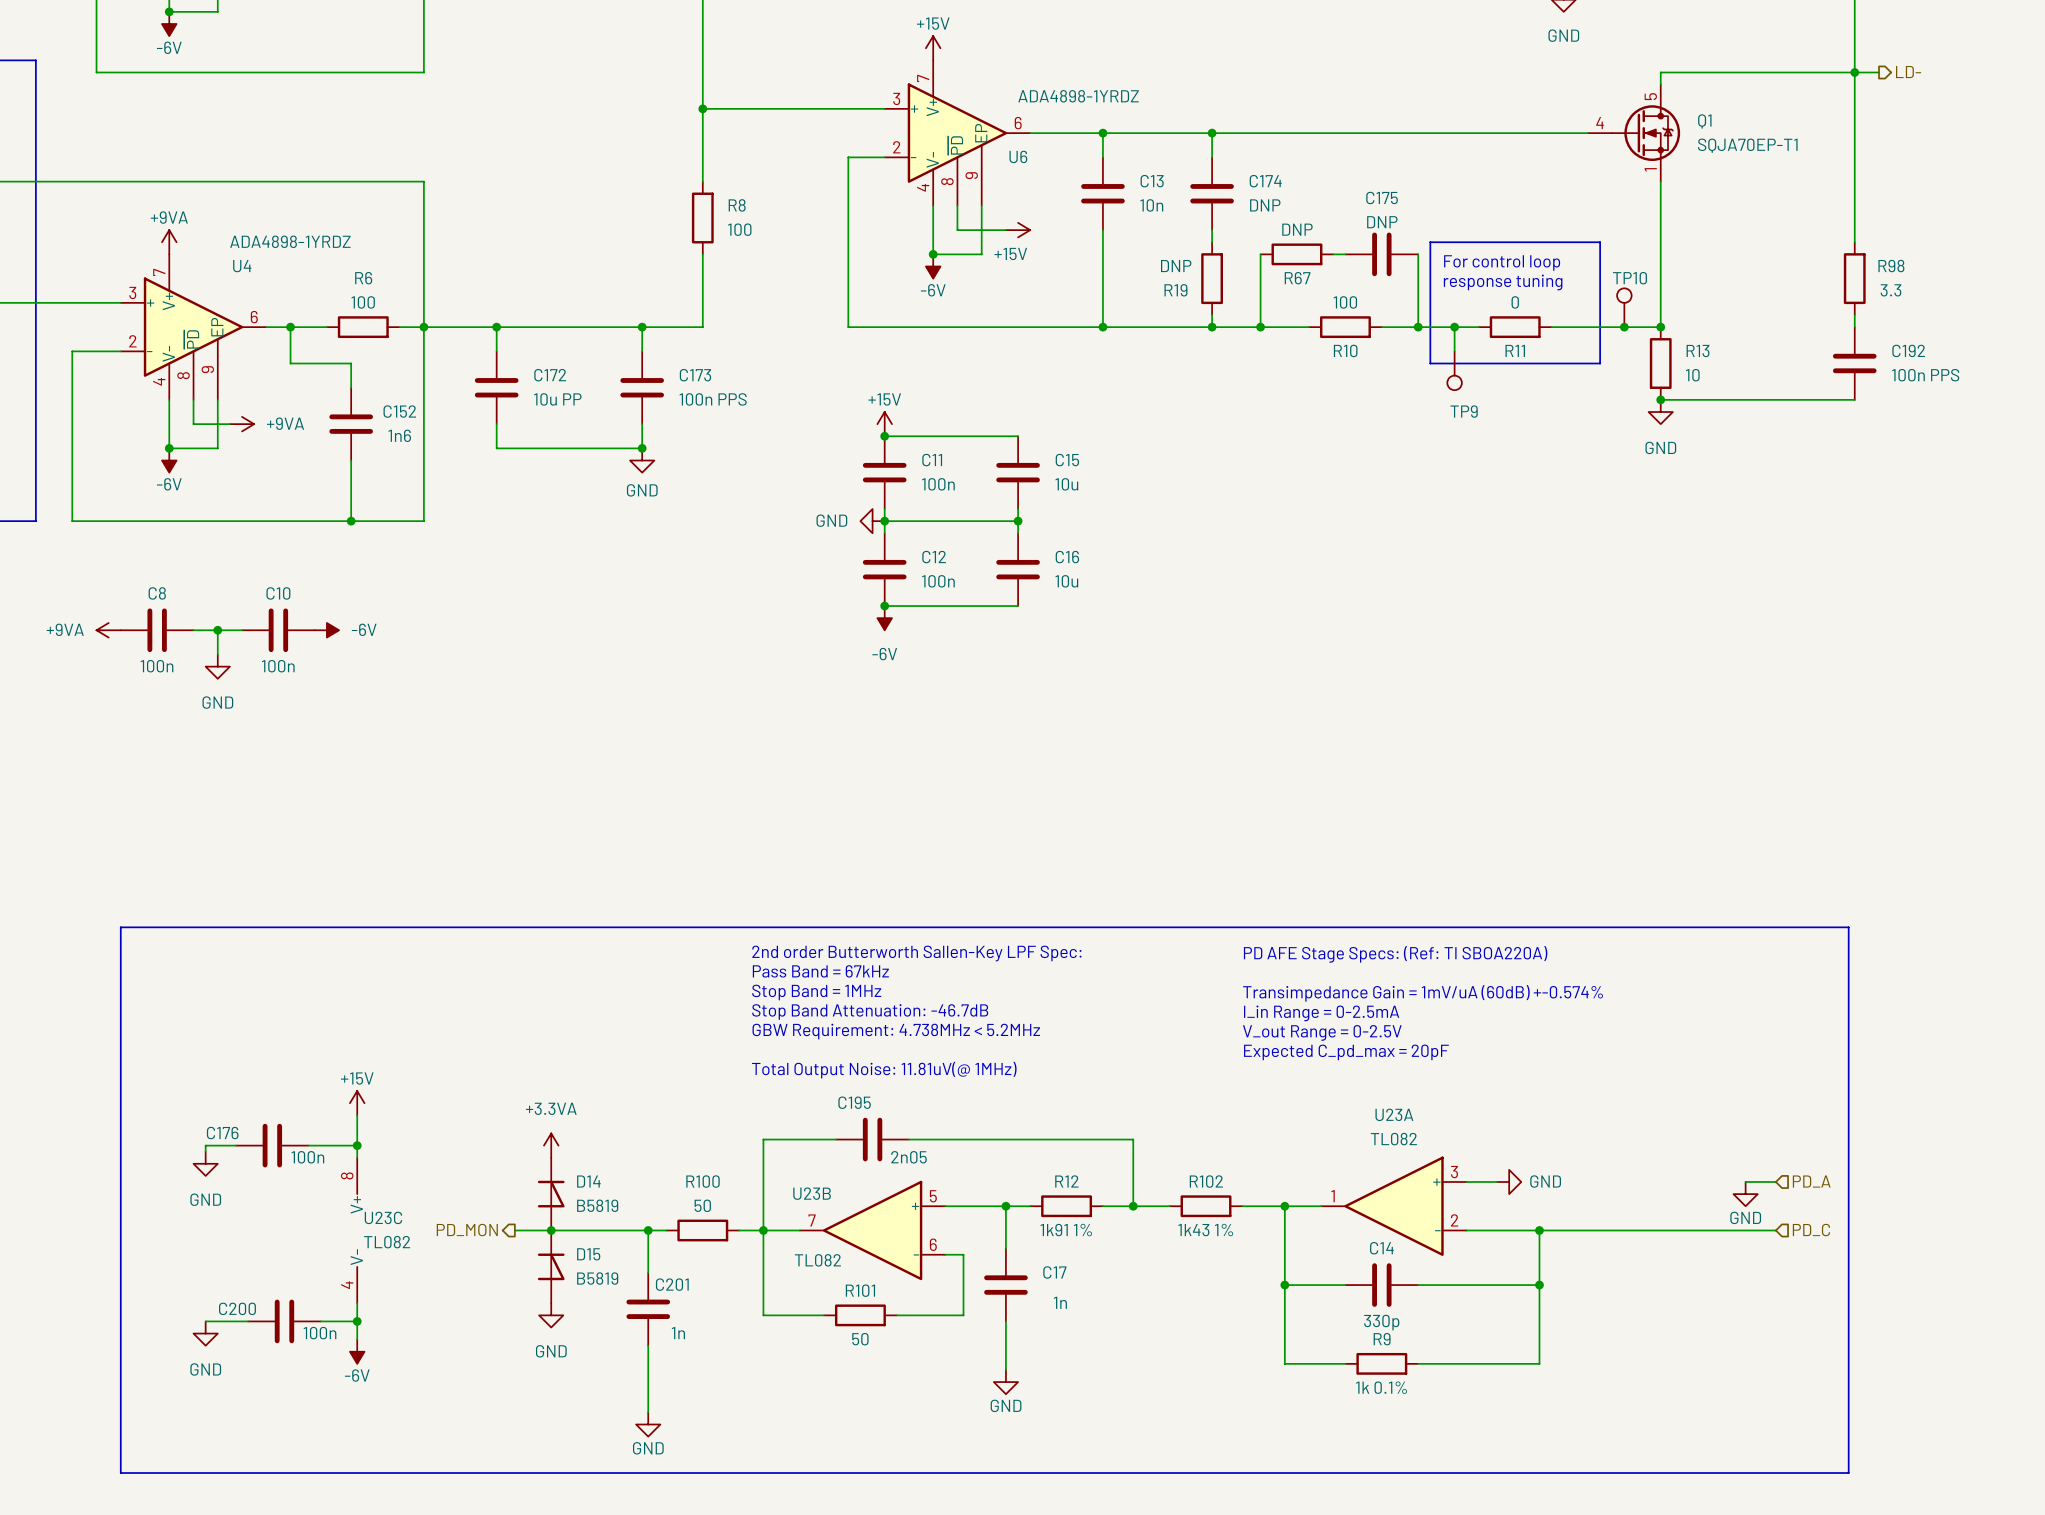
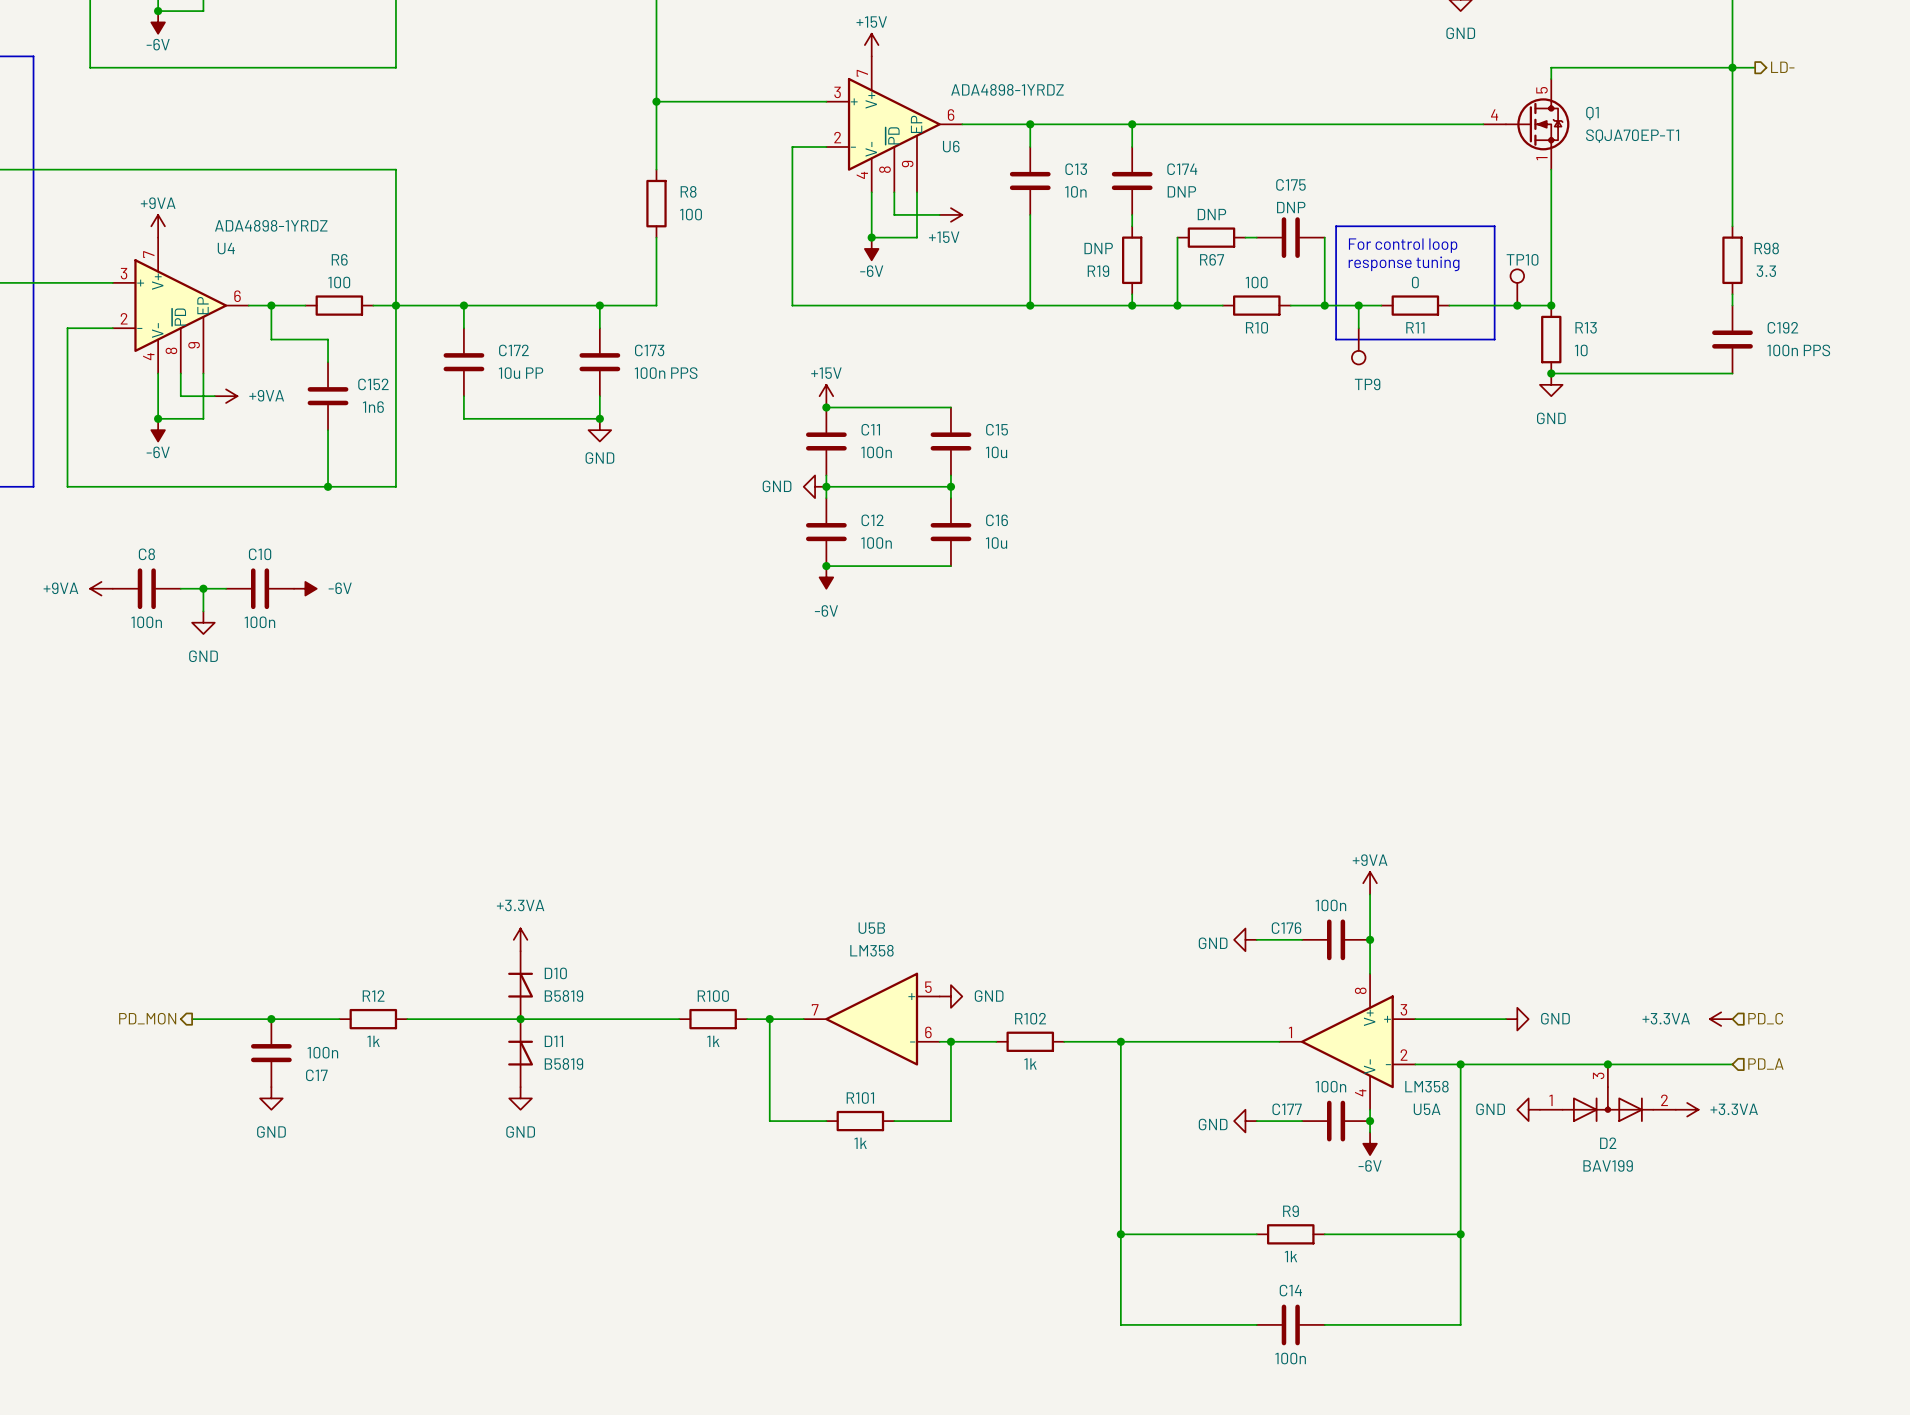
line: (120, 927) (1848, 927) (1848, 1473) (120, 1473) (120, 927) -> none
power symbol: none -> +9VA (1370, 883)
text: 2nd order Butterworth Sallen-Key LPF Spec: (916, 953) -> none
text: PD AFE Stage Specs: (Ref: TI SBOA220A) (1395, 954) -> none
wire: none -> (1370, 894) (1370, 973)
text: Pass Band = 67kHz (820, 971) -> none
text: Stop Band = 1MHz (816, 992) -> none
text: Transimpedance Gain = 1mV/uA (60dB) +-0.574% (1423, 993) -> none
power symbol: none -> GND (1245, 939)
wire: none -> (1256, 939) (1302, 939)
junction: none -> (1370, 939)
text: Stop Band Attenuation: -46.7dB (870, 1012) -> none
text: I_in Range = 0-2.5mA (1321, 1013) -> none
text: GBW Requirement: 4.738MHz < 5.2MHz (896, 1031) -> none
text: V_out Range = 0-2.5V (1322, 1032) -> none
text: Expected C_pd_max = 20pF (1346, 1052) -> none
D10: none -> B5819 (520, 985)
power symbol: none -> GND (950, 996)
text: Total Output Noise: 11.81uV(@ 1MHz) (884, 1070) -> none
hierarchical label: none -> PD_MON (147, 1018)
wire: none -> (192, 1019) (339, 1019)
junction: none -> (271, 1019)
wire: none -> (407, 1019) (679, 1019)
junction: none -> (520, 1019)
wire: none -> (769, 1019) (769, 1121) (826, 1121)
junction: none -> (769, 1019)
U5B: none -> LM358 (871, 1019)
wire: none -> (1415, 1019) (1505, 1019)
power symbol: none -> GND (1517, 1019)
power symbol: none -> +3.3VA (1721, 1019)
power symbol: +15V (357, 1103) -> none
wire: (357, 1115) (357, 1157) -> none
wire: none -> (939, 1041) (996, 1041)
wire: none -> (950, 1041) (950, 1121) (894, 1121)
junction: none -> (950, 1041)
wire: none -> (1064, 1041) (1279, 1041)
wire: none -> (1120, 1041) (1120, 1324) (1256, 1324)
junction: none -> (1120, 1041)
U5A: none -> LM358 (1347, 1041)
part: none -> (1370, 1041)
D11: none -> B5819 (520, 1053)
C176 name position: C176 (222, 1133) -> C176 (1286, 928)
wire: (836, 1139) (763, 1139) (763, 1315) (824, 1315) -> none
C195: 2n05 (872, 1139) -> none
wire: (908, 1139) (1133, 1139) (1133, 1206) -> none
wire: none -> (1415, 1064) (1732, 1064)
wire: none -> (1460, 1064) (1460, 1324) (1324, 1324)
junction: none -> (1460, 1064)
junction: none -> (1607, 1064)
wire: (235, 1145) (205, 1145) (205, 1151) -> none
C176 position: (272, 1145) -> (1336, 939)
wire: (308, 1145) (357, 1145) -> none
junction: (357, 1145) -> none
power symbol position: +3.3VA (551, 1145) -> +3.3VA (520, 939)
C176 value position: 100n (307, 1157) -> 100n (1330, 905)
power symbol position: GND (205, 1163) -> GND (271, 1098)
D2: none -> BAV199 (1607, 1093)
power symbol: none -> GND (520, 1098)
R100 name position: R100 (703, 1181) -> R100 (713, 996)
wire: (1466, 1181) (1497, 1181) -> none
power symbol: GND (1509, 1181) -> none
wire: (1745, 1181) (1775, 1181) -> none
hierarchical label position: PD_A (1811, 1181) -> PD_A (1765, 1064)
wire: none -> (1370, 1109) (1370, 1132)
power symbol: none -> GND (1528, 1109)
power symbol: none -> +3.3VA (1687, 1109)
D14: B5819 (551, 1194) -> none
power symbol: GND (1745, 1194) -> none
power symbol: none -> GND (1245, 1121)
C177: none -> 100n (1336, 1121)
junction: none -> (1370, 1121)
R100 value: 50 (702, 1205) -> 1k (713, 1041)
wire: (945, 1206) (1030, 1206) -> none
wire: (1005, 1206) (1005, 1248) -> none
junction: (1005, 1206) -> none
R12 position: (1066, 1206) -> (373, 1019)
wire: (1102, 1206) (1169, 1206) -> none
junction: (1133, 1206) -> none
R102 position: (1206, 1206) -> (1030, 1041)
wire: (1242, 1206) (1321, 1206) -> none
wire: (1284, 1206) (1284, 1363) (1345, 1363) -> none
junction: (1284, 1206) -> none
U23A: TL082 (1393, 1206) -> none
power symbol: none -> -6V (1370, 1143)
U23C: TL082 (357, 1230) -> none
hierarchical label: PD_MON (467, 1230) -> none
wire: (514, 1230) (666, 1230) -> none
junction: (551, 1230) -> none
wire: (648, 1230) (648, 1272) -> none
junction: (648, 1230) -> none
R100 position: (702, 1230) -> (713, 1019)
wire: (739, 1230) (799, 1230) -> (747, 1019) (803, 1019)
junction: (763, 1230) -> none
U23B: TL082 (872, 1230) -> none
R12 value: 1k91 1% (1066, 1230) -> 1k (373, 1041)
R102 value: 1k43 1% (1205, 1230) -> 1k (1030, 1064)
wire: (1466, 1230) (1775, 1230) -> none
wire: (1539, 1230) (1539, 1363) (1418, 1363) -> none
junction: (1539, 1230) -> none
hierarchical label position: PD_C (1811, 1230) -> PD_C (1765, 1018)
wire: (945, 1254) (963, 1254) (963, 1315) (896, 1315) -> none
D15: B5819 (551, 1266) -> none
C17 name position: C17 (1054, 1272) -> C17 (316, 1075)
C17 position: (1005, 1285) -> (271, 1053)
wire: (1284, 1285) (1345, 1285) -> none
junction: (1284, 1285) -> none
C14 position: (1381, 1285) -> (1290, 1324)
wire: (1418, 1285) (1539, 1285) -> none
junction position: (1539, 1285) -> (1460, 1234)
C17 value: 1n (1060, 1302) -> 100n (322, 1052)
wire: (357, 1303) (357, 1339) -> none
C201: 1n (648, 1309) -> none
power symbol: GND (551, 1315) -> none
R101 position: (860, 1315) -> (860, 1121)
wire: (205, 1321) (248, 1321) -> none
C200: 100n (284, 1321) -> none
wire: (320, 1321) (357, 1321) -> none
junction: (357, 1321) -> none
wire: (1005, 1321) (1005, 1369) -> none
wire: none -> (1120, 1234) (1256, 1234)
junction: none -> (1120, 1234)
wire: none -> (1324, 1234) (1460, 1234)
C14 value: 330p (1381, 1322) -> 100n (1290, 1358)
power symbol: GND (205, 1333) -> none
R101 value: 50 (860, 1339) -> 1k (860, 1143)
wire: (648, 1345) (648, 1412) -> none
power symbol: -6V (357, 1351) -> none
R9 position: (1381, 1363) -> (1290, 1234)
power symbol: GND (1005, 1382) -> none
R9 value: 1k 0.1% (1381, 1387) -> 1k (1290, 1256)
power symbol: GND (648, 1424) -> none

